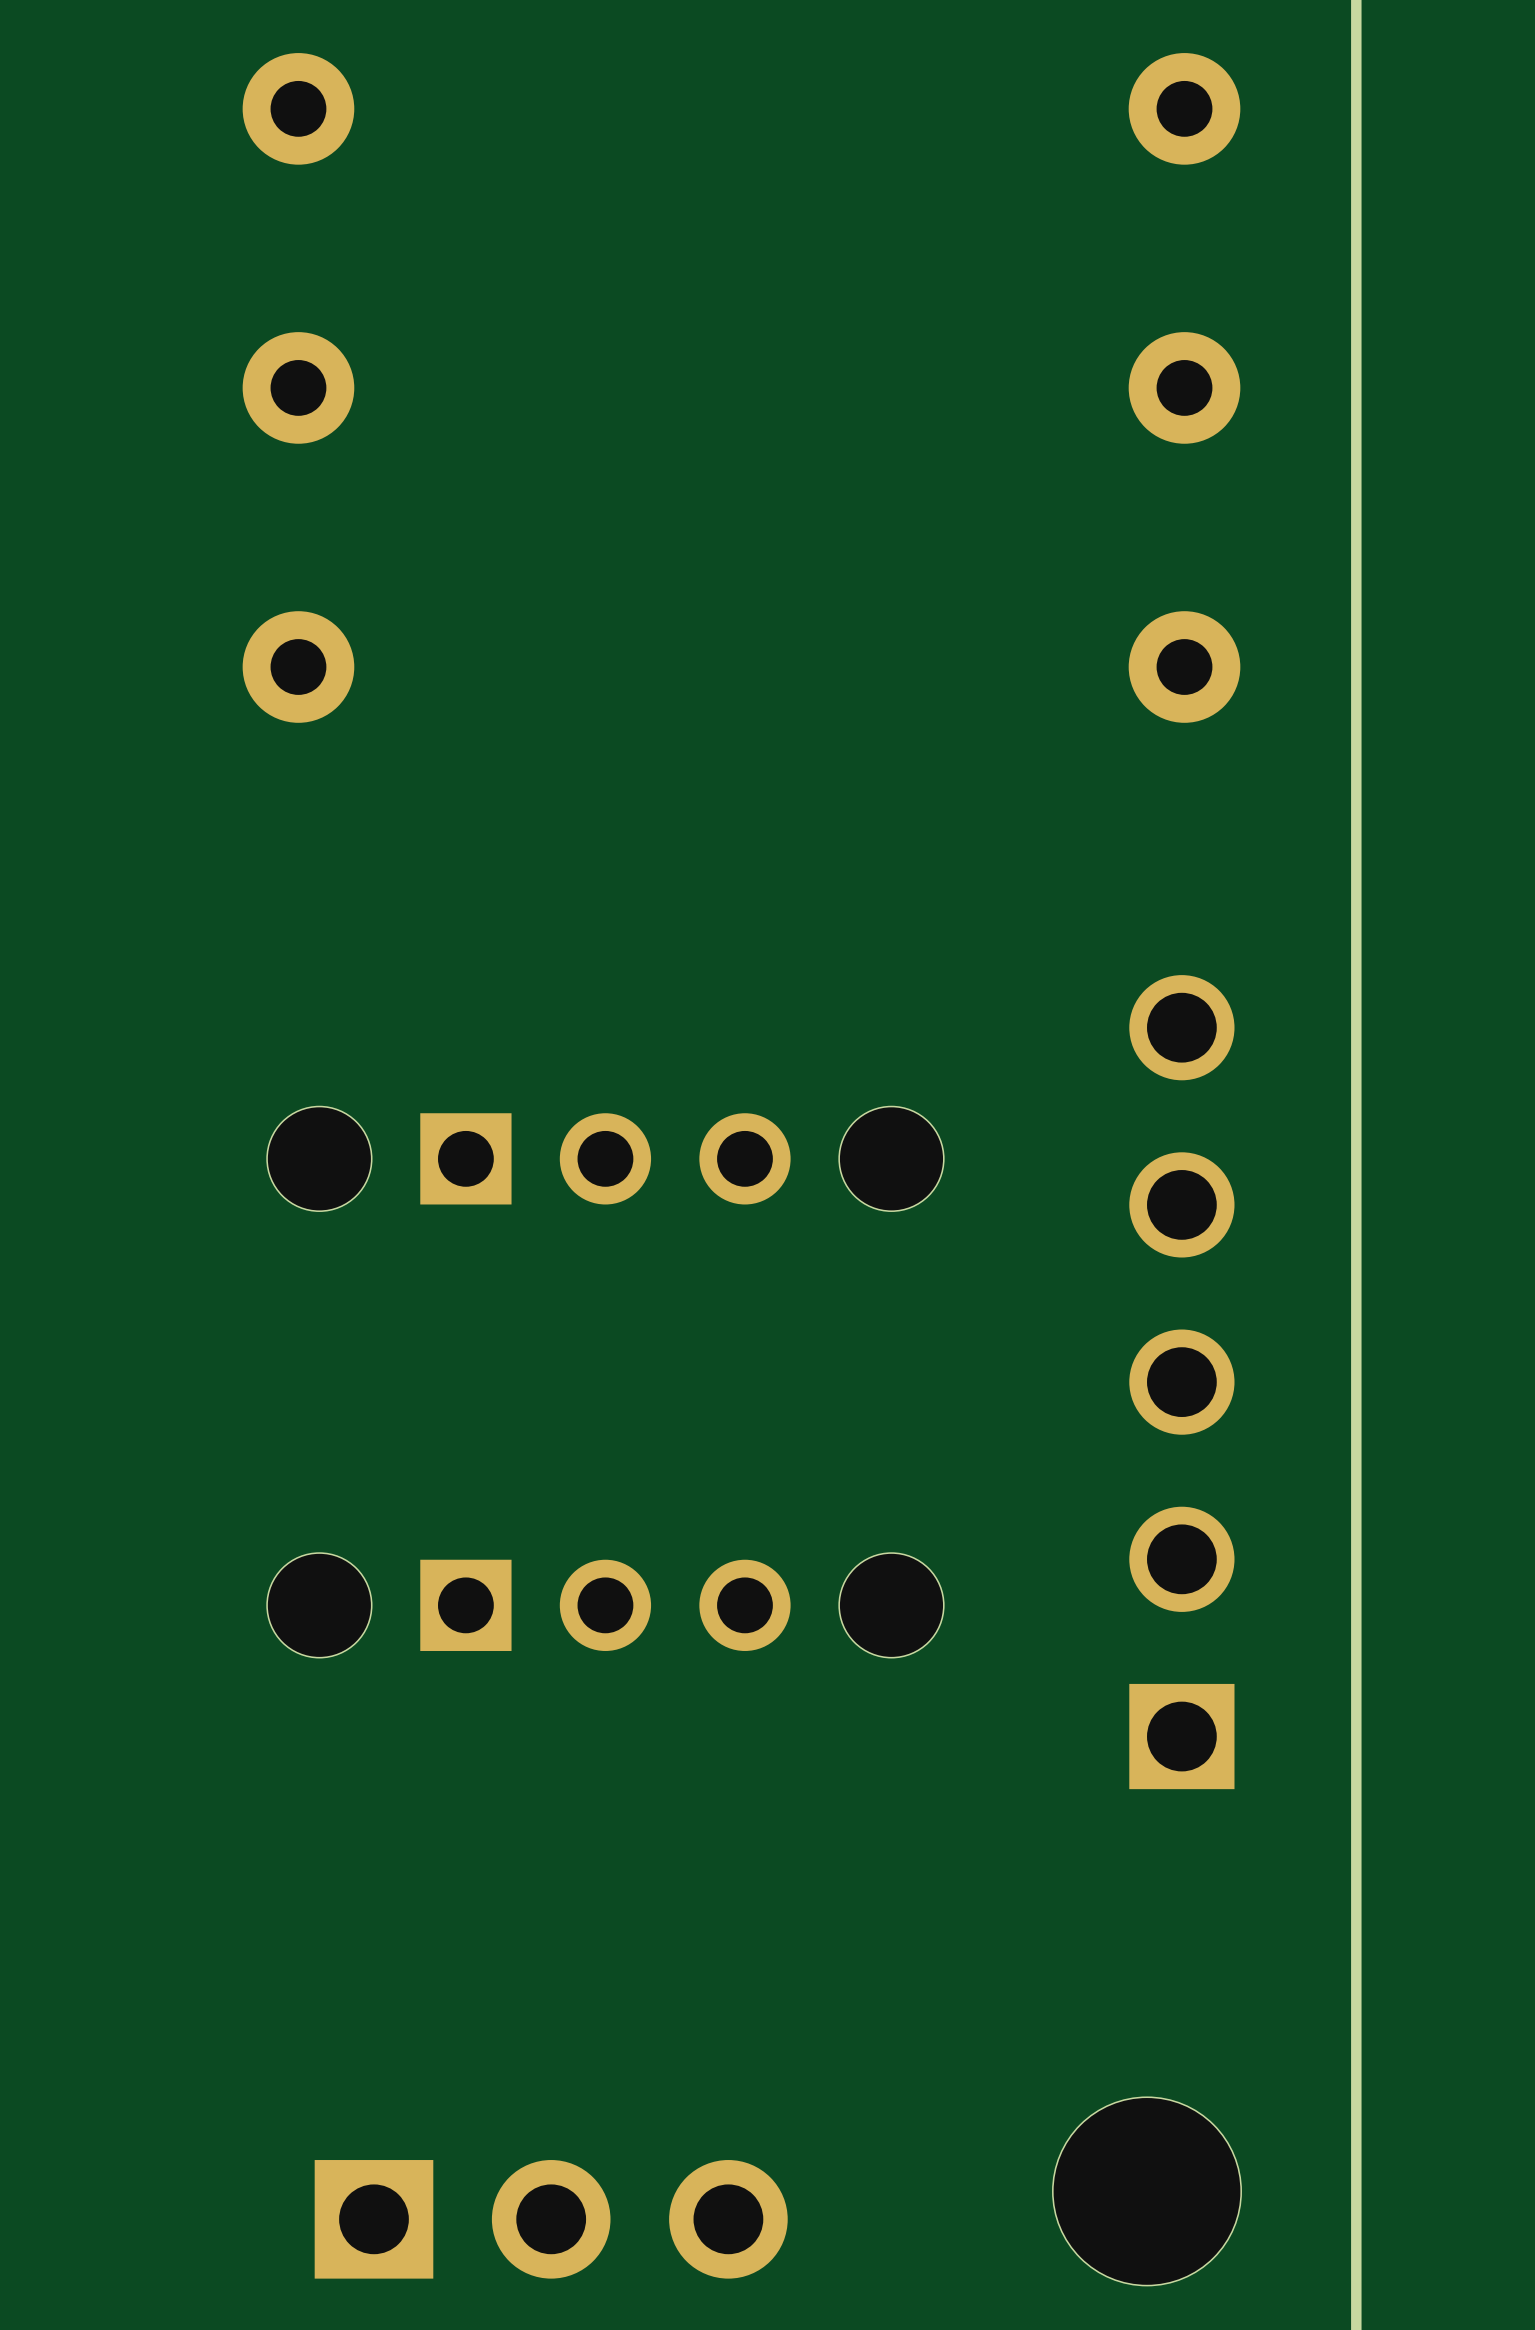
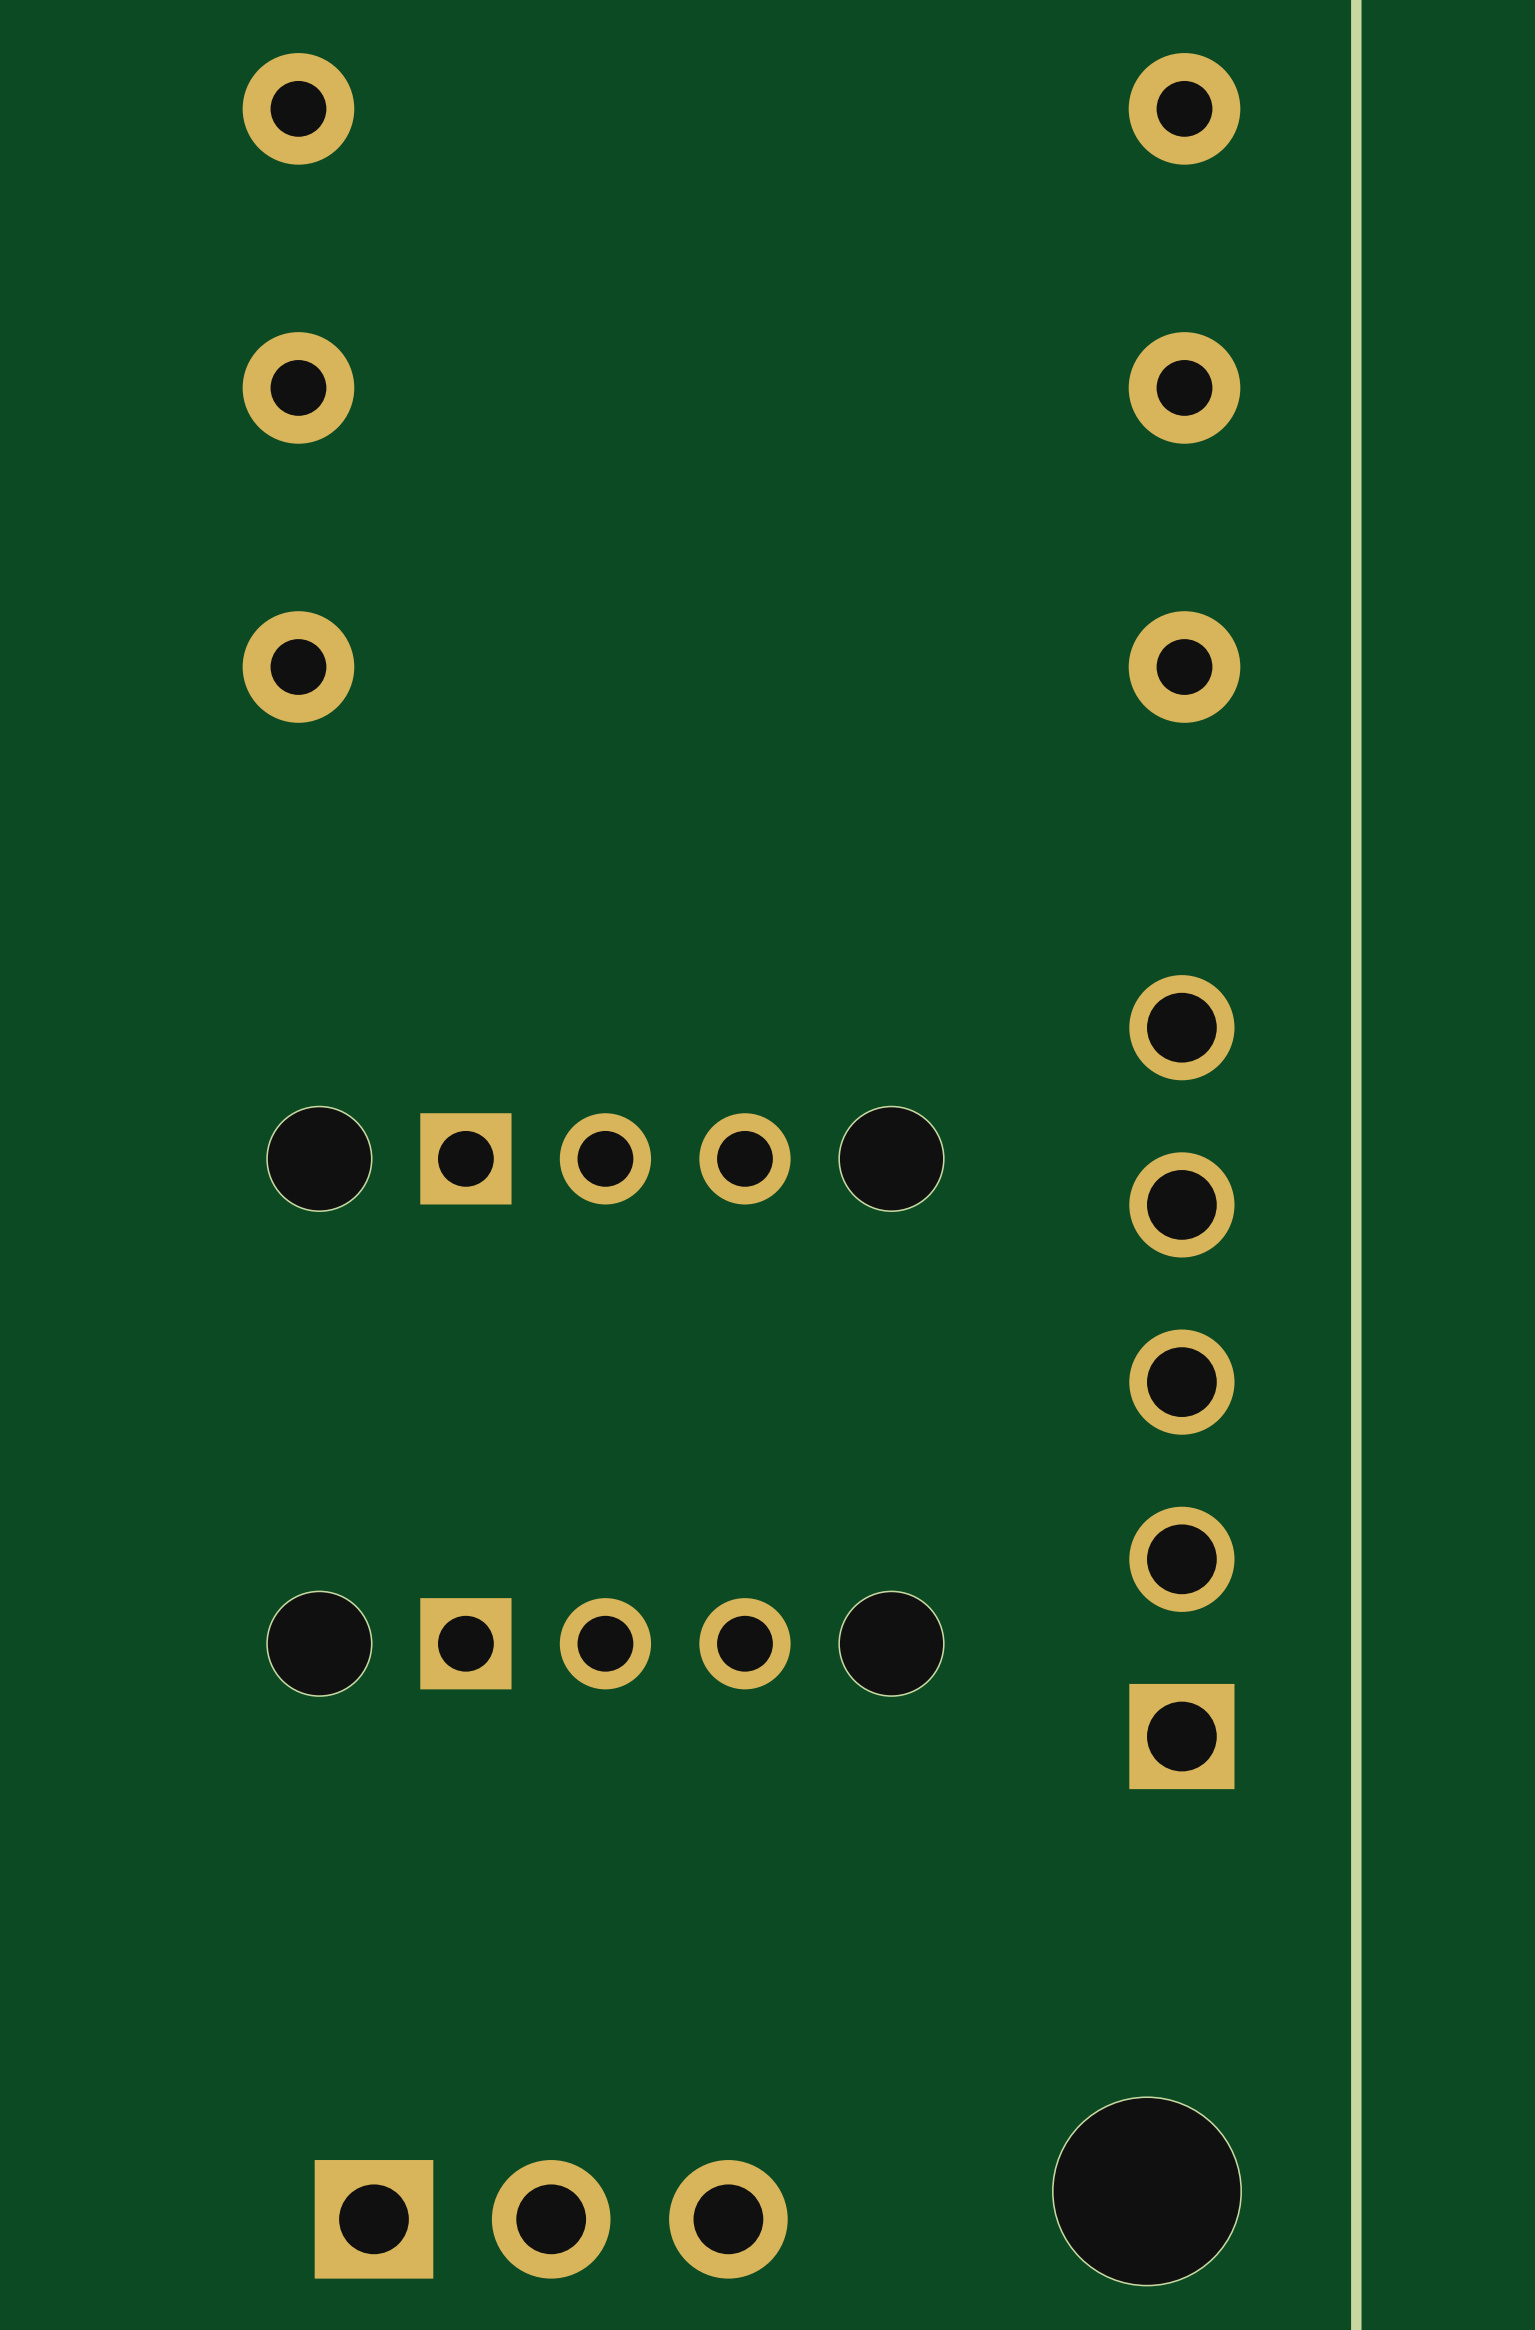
part position: (605, 1605) -> (605, 1643)

